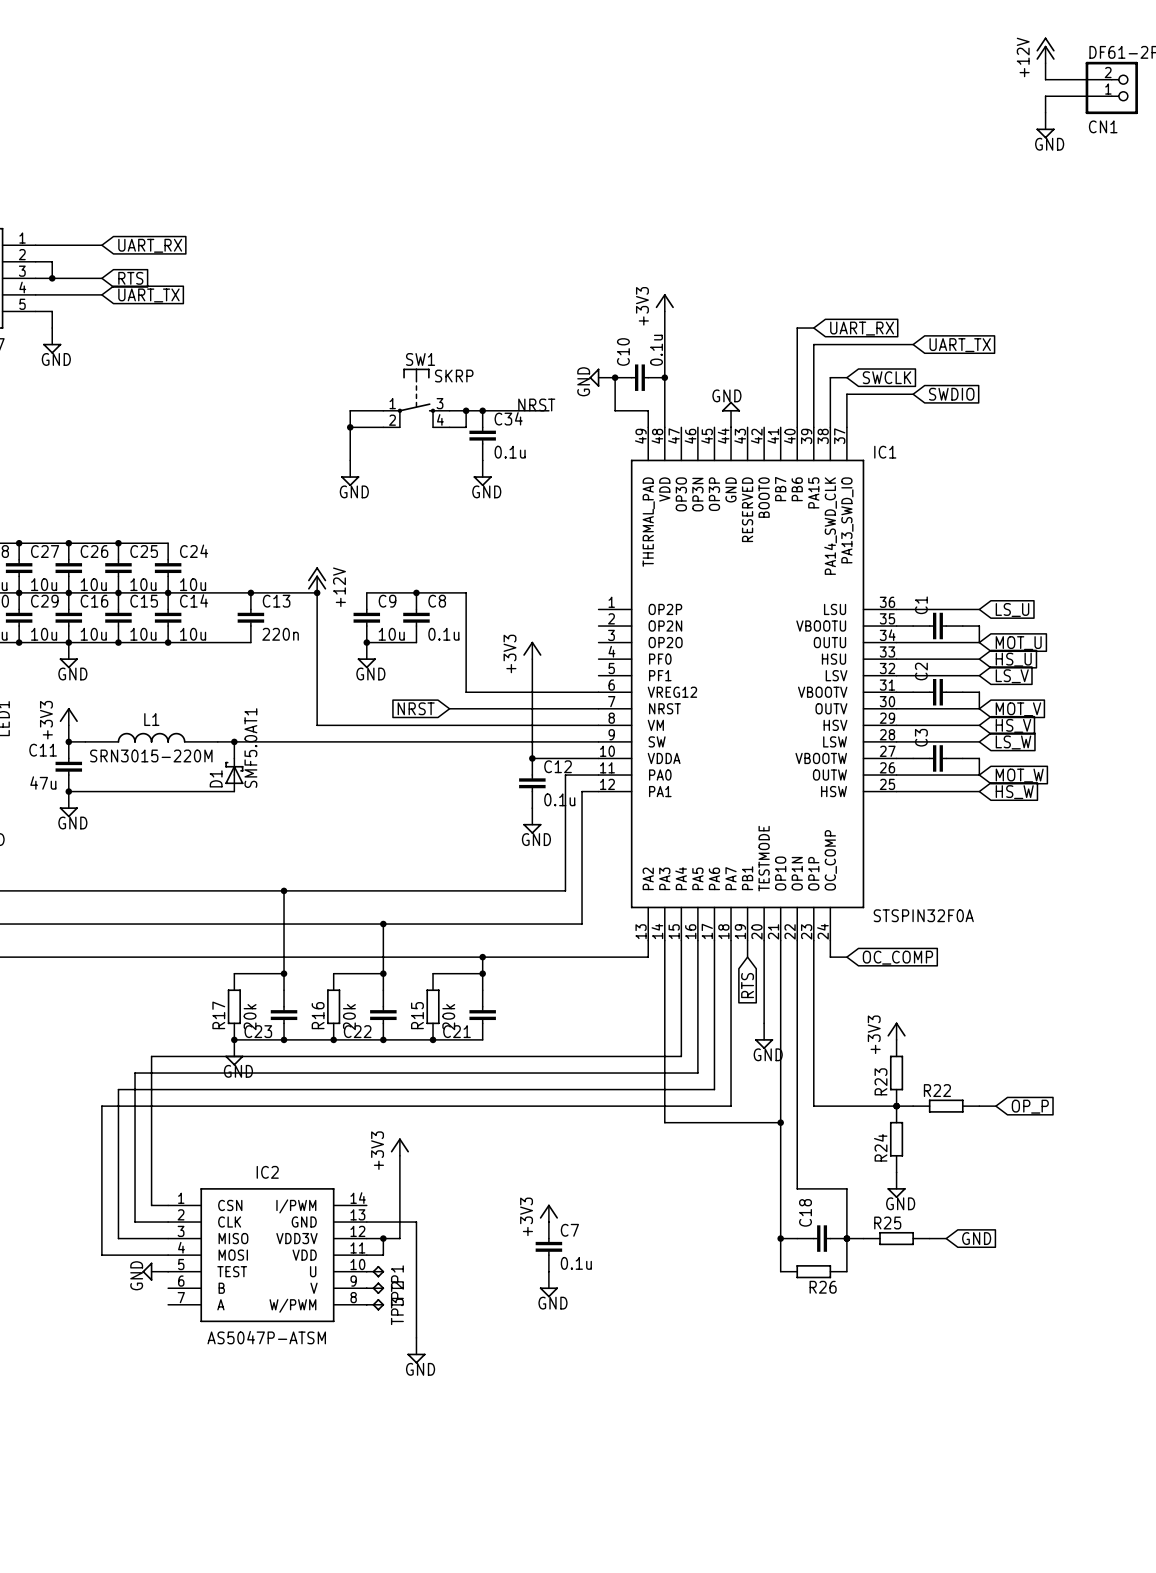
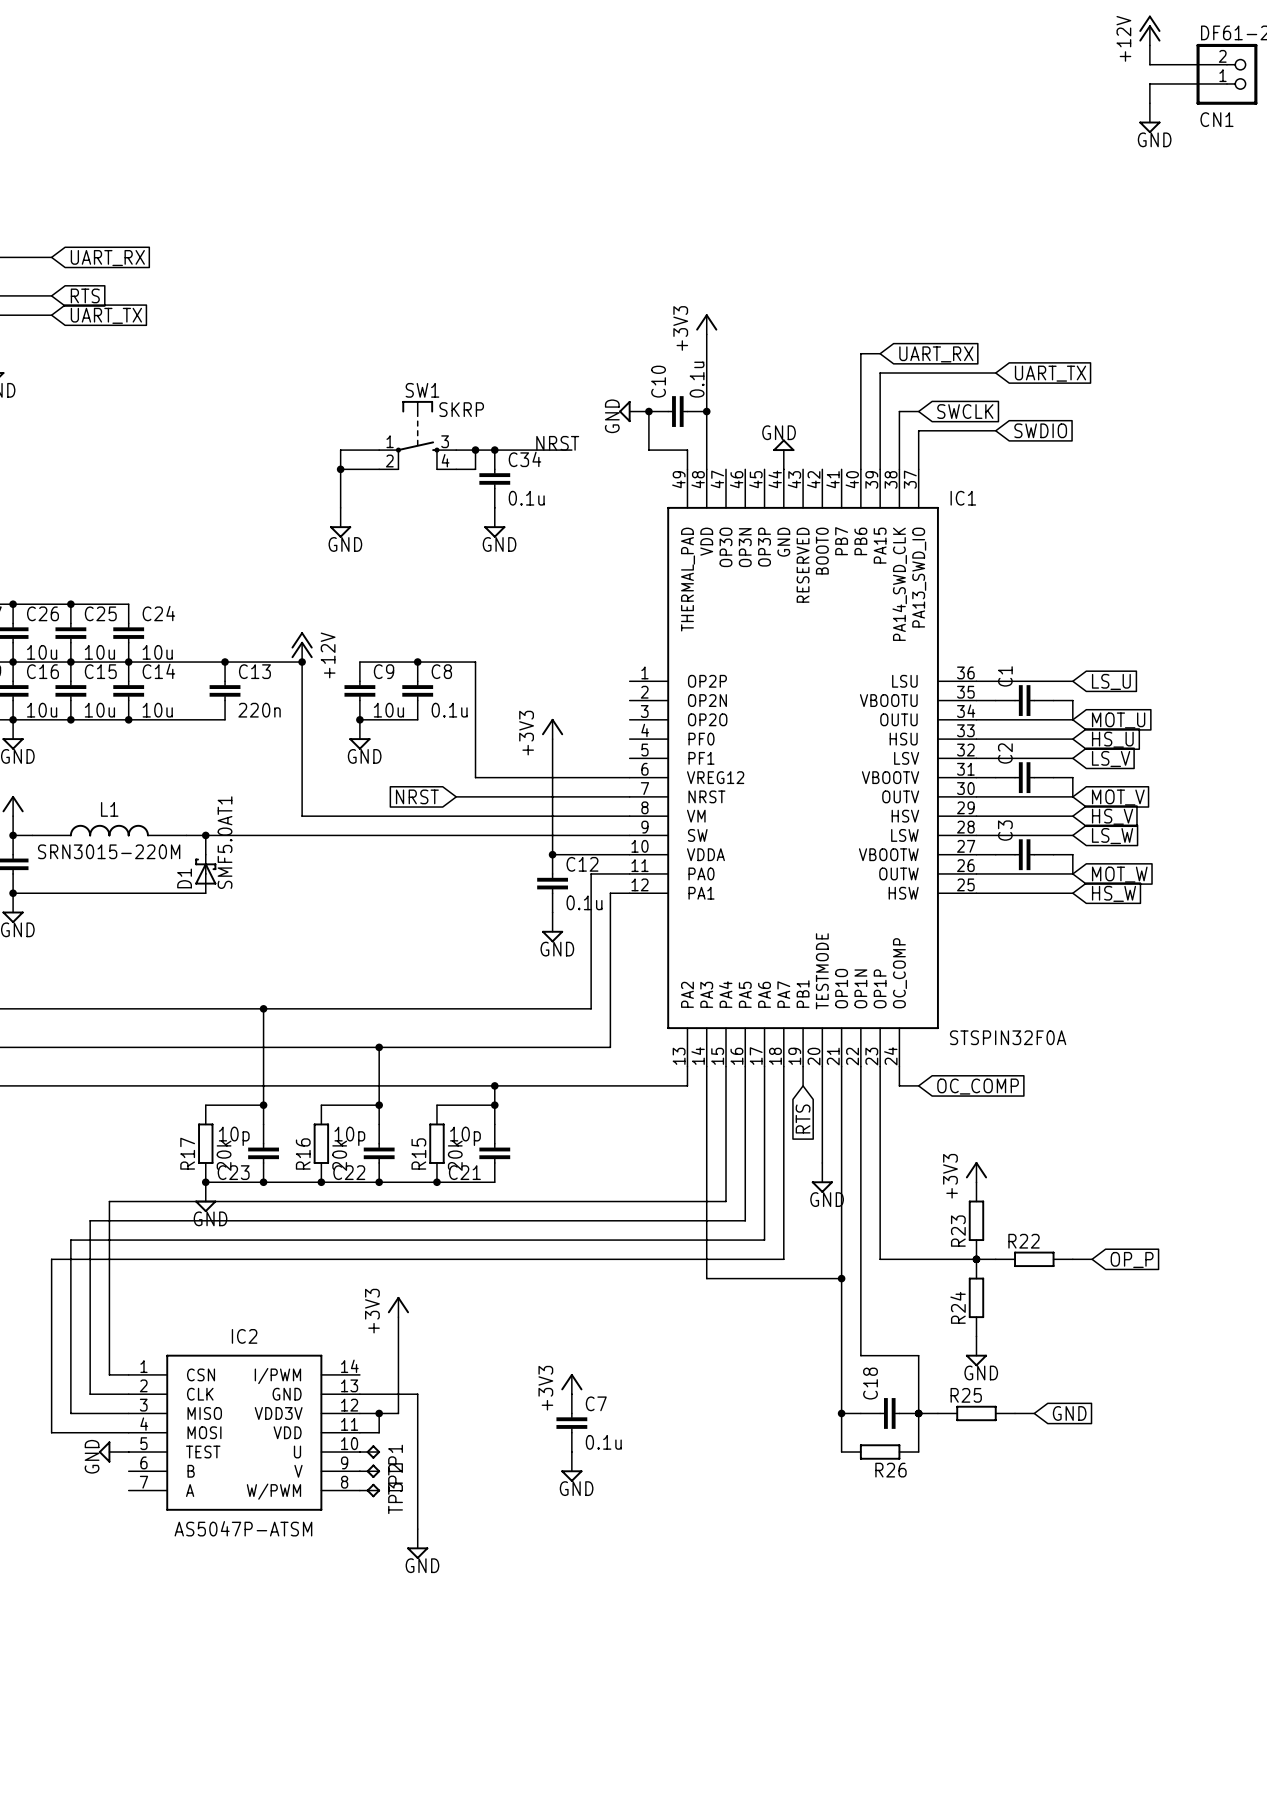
C23 value: none -> 10p (234, 1136)
C22 value: none -> 10p (349, 1136)
C21 value: none -> 10p (465, 1136)

